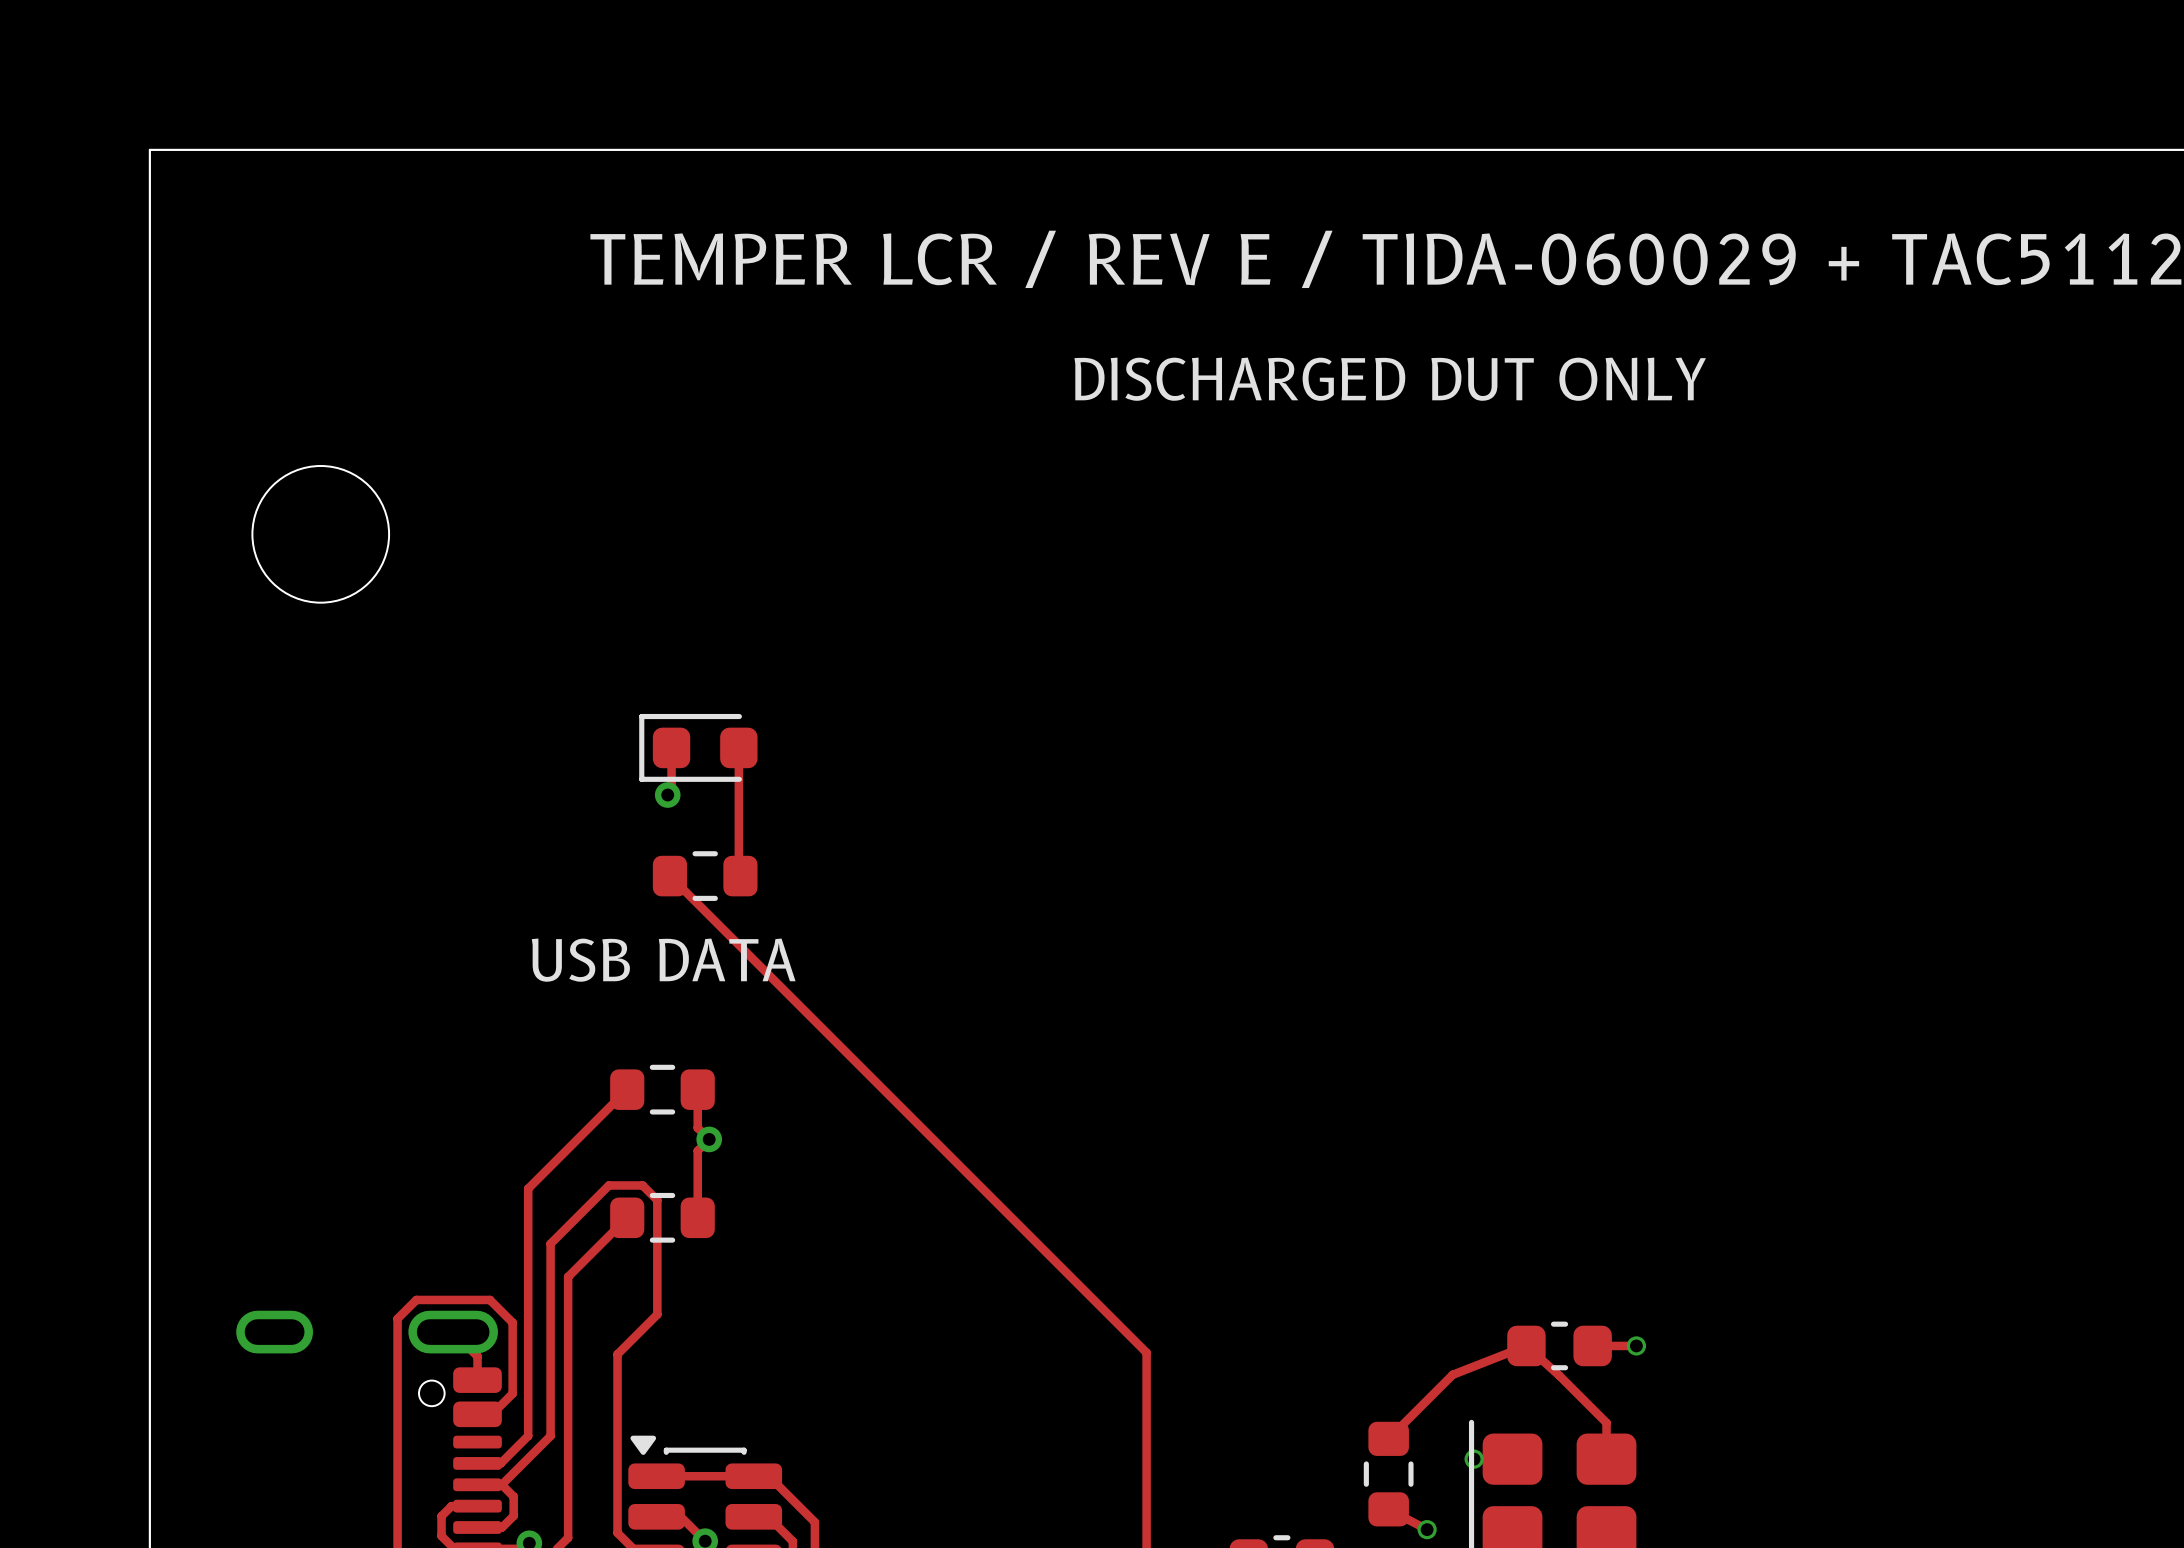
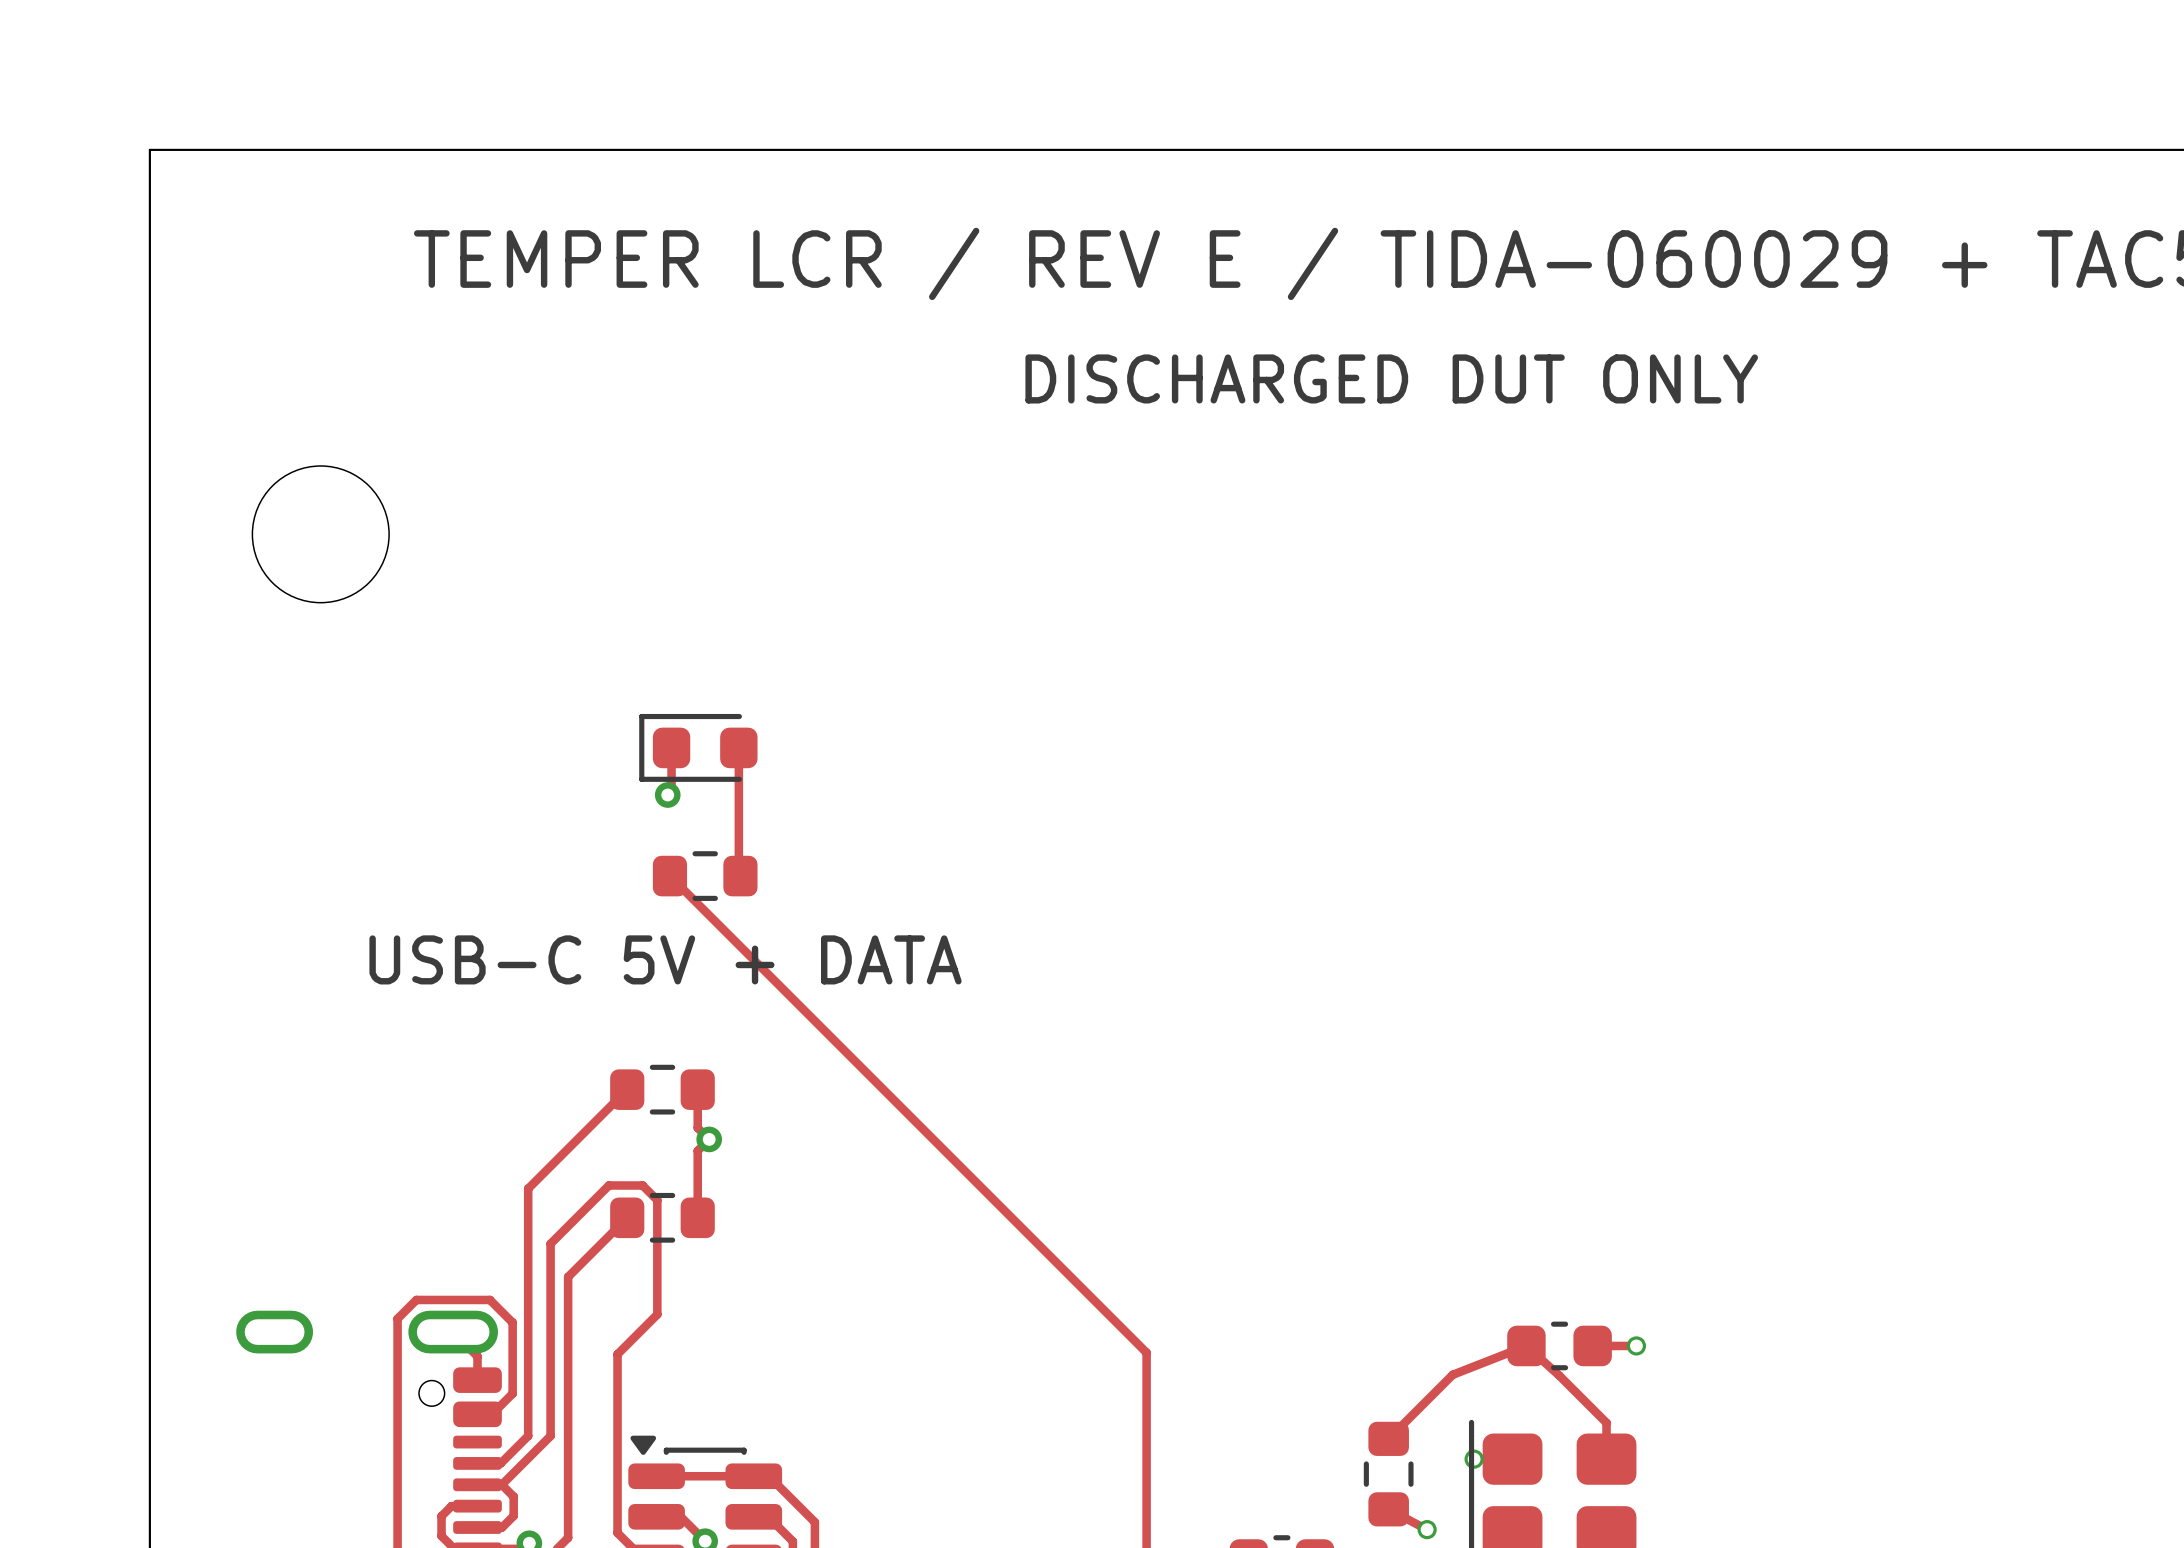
text: USB DATA (663, 960) -> USB-C 5V + DATA (665, 959)

